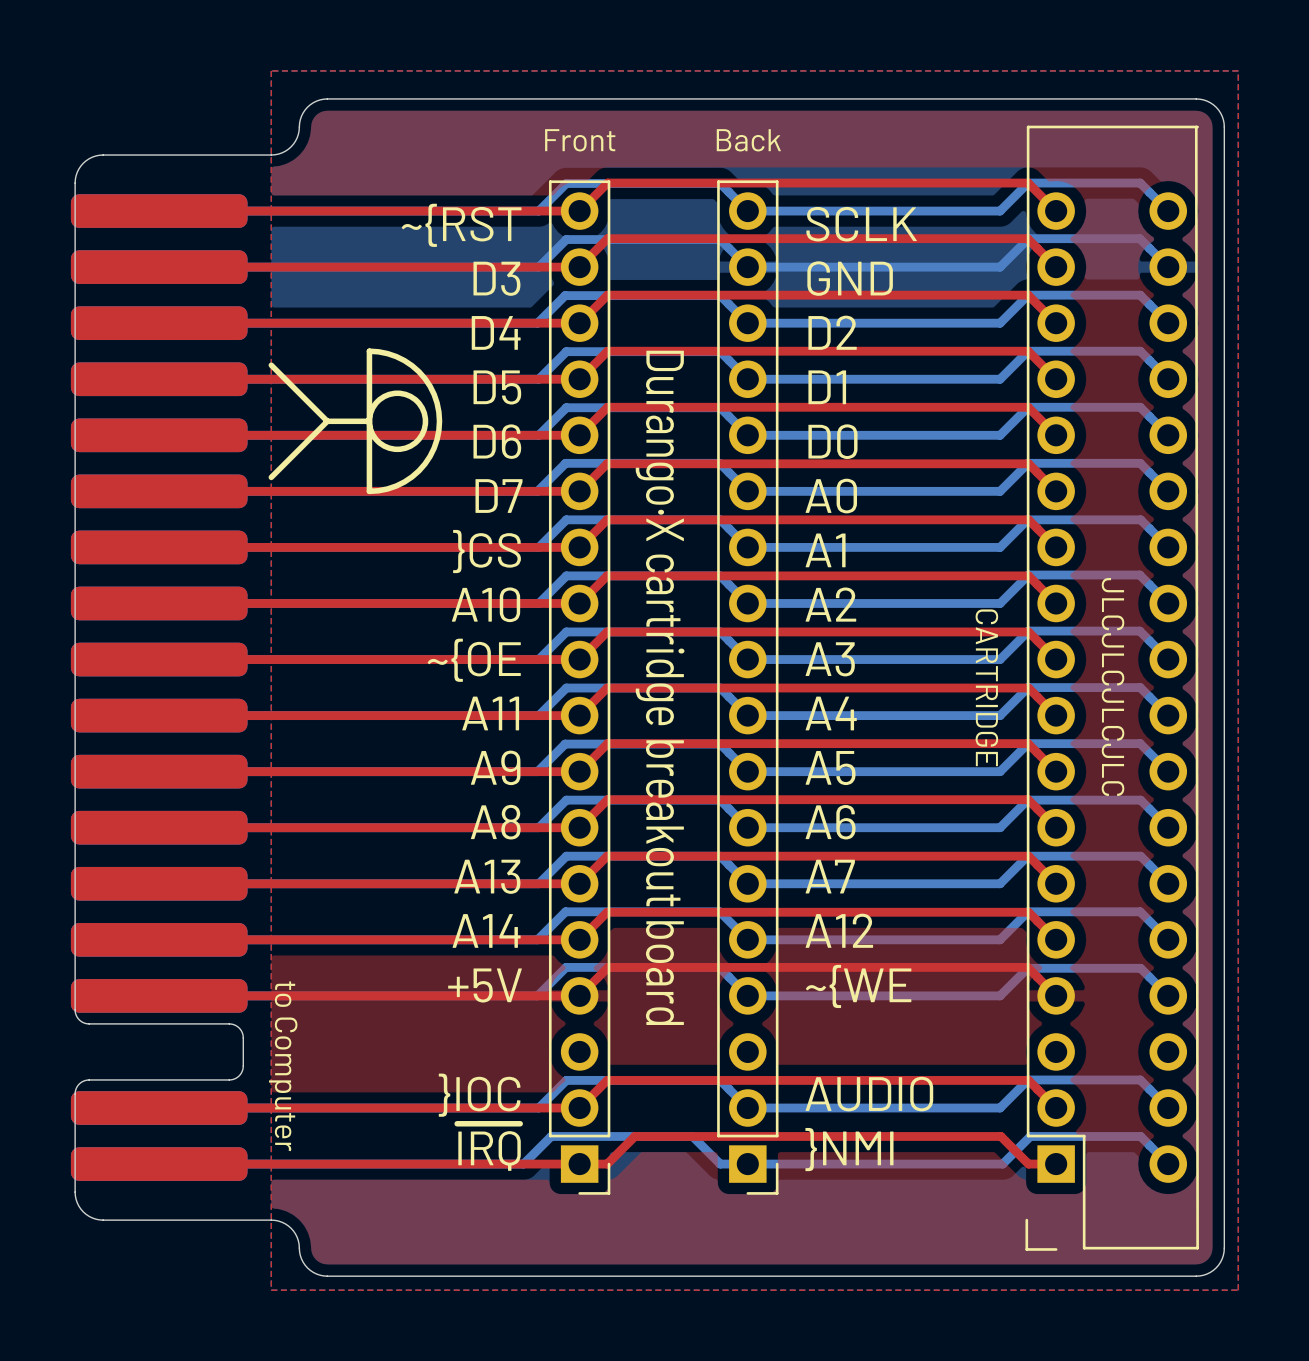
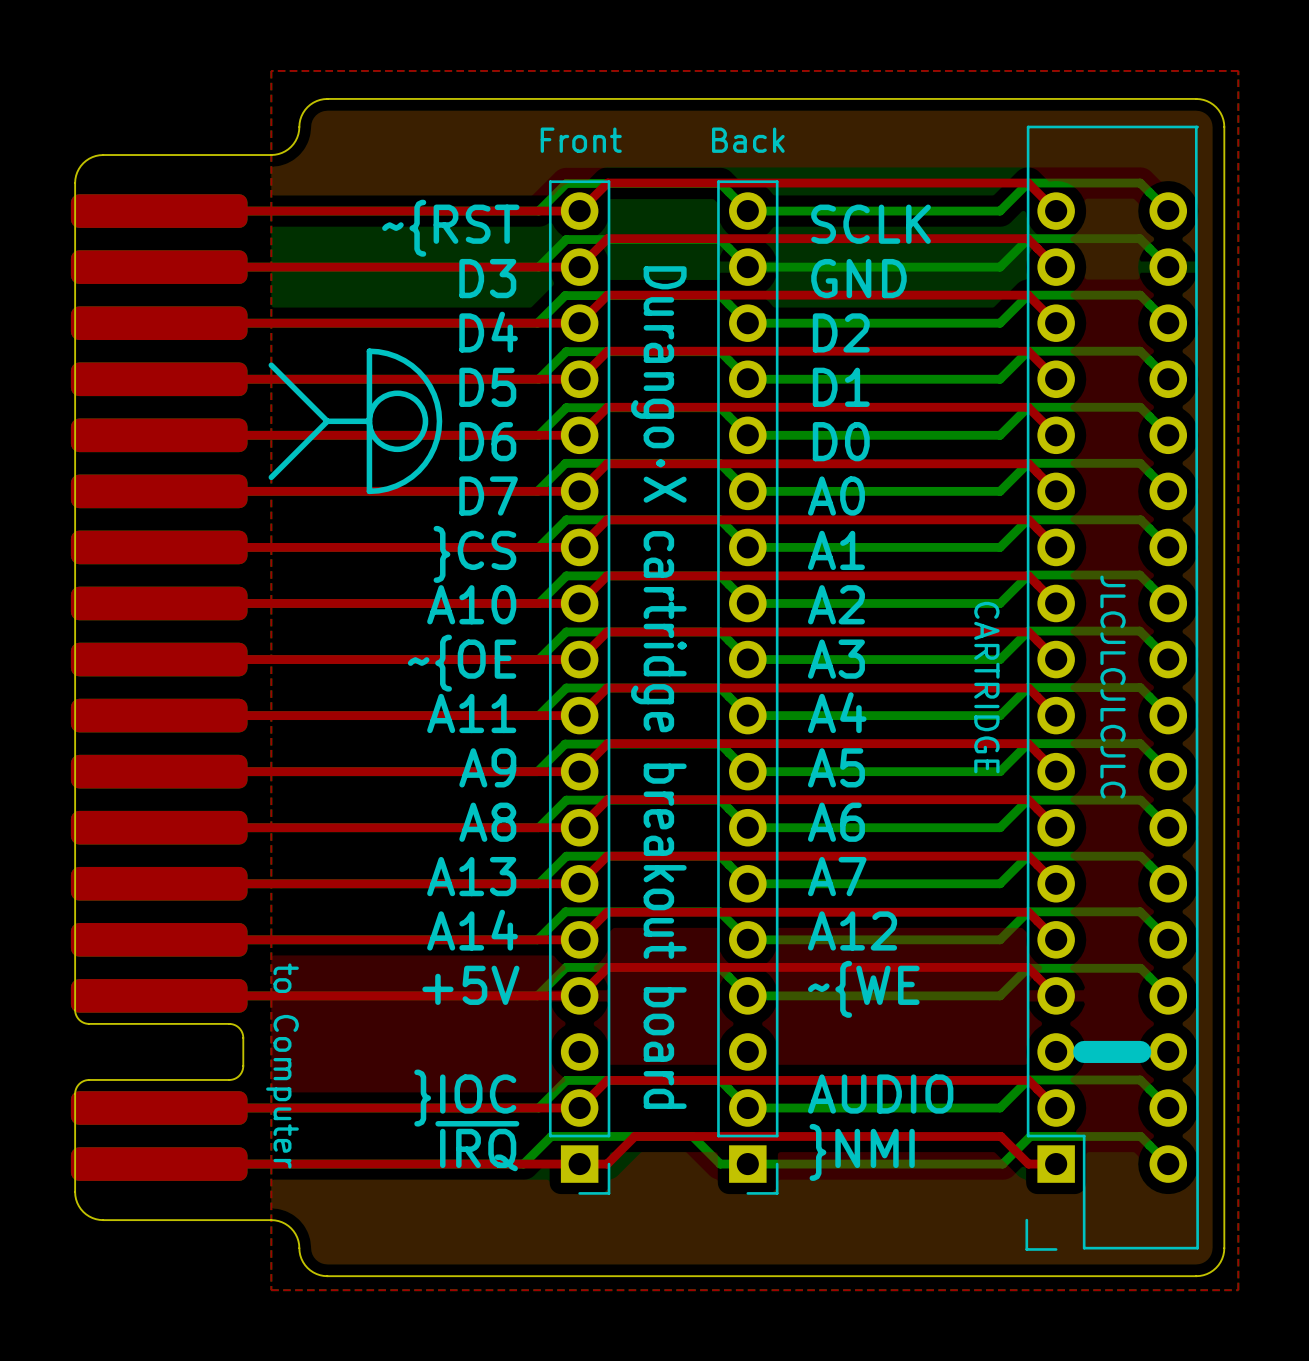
line: none -> (1084, 1051) (1140, 1051)

